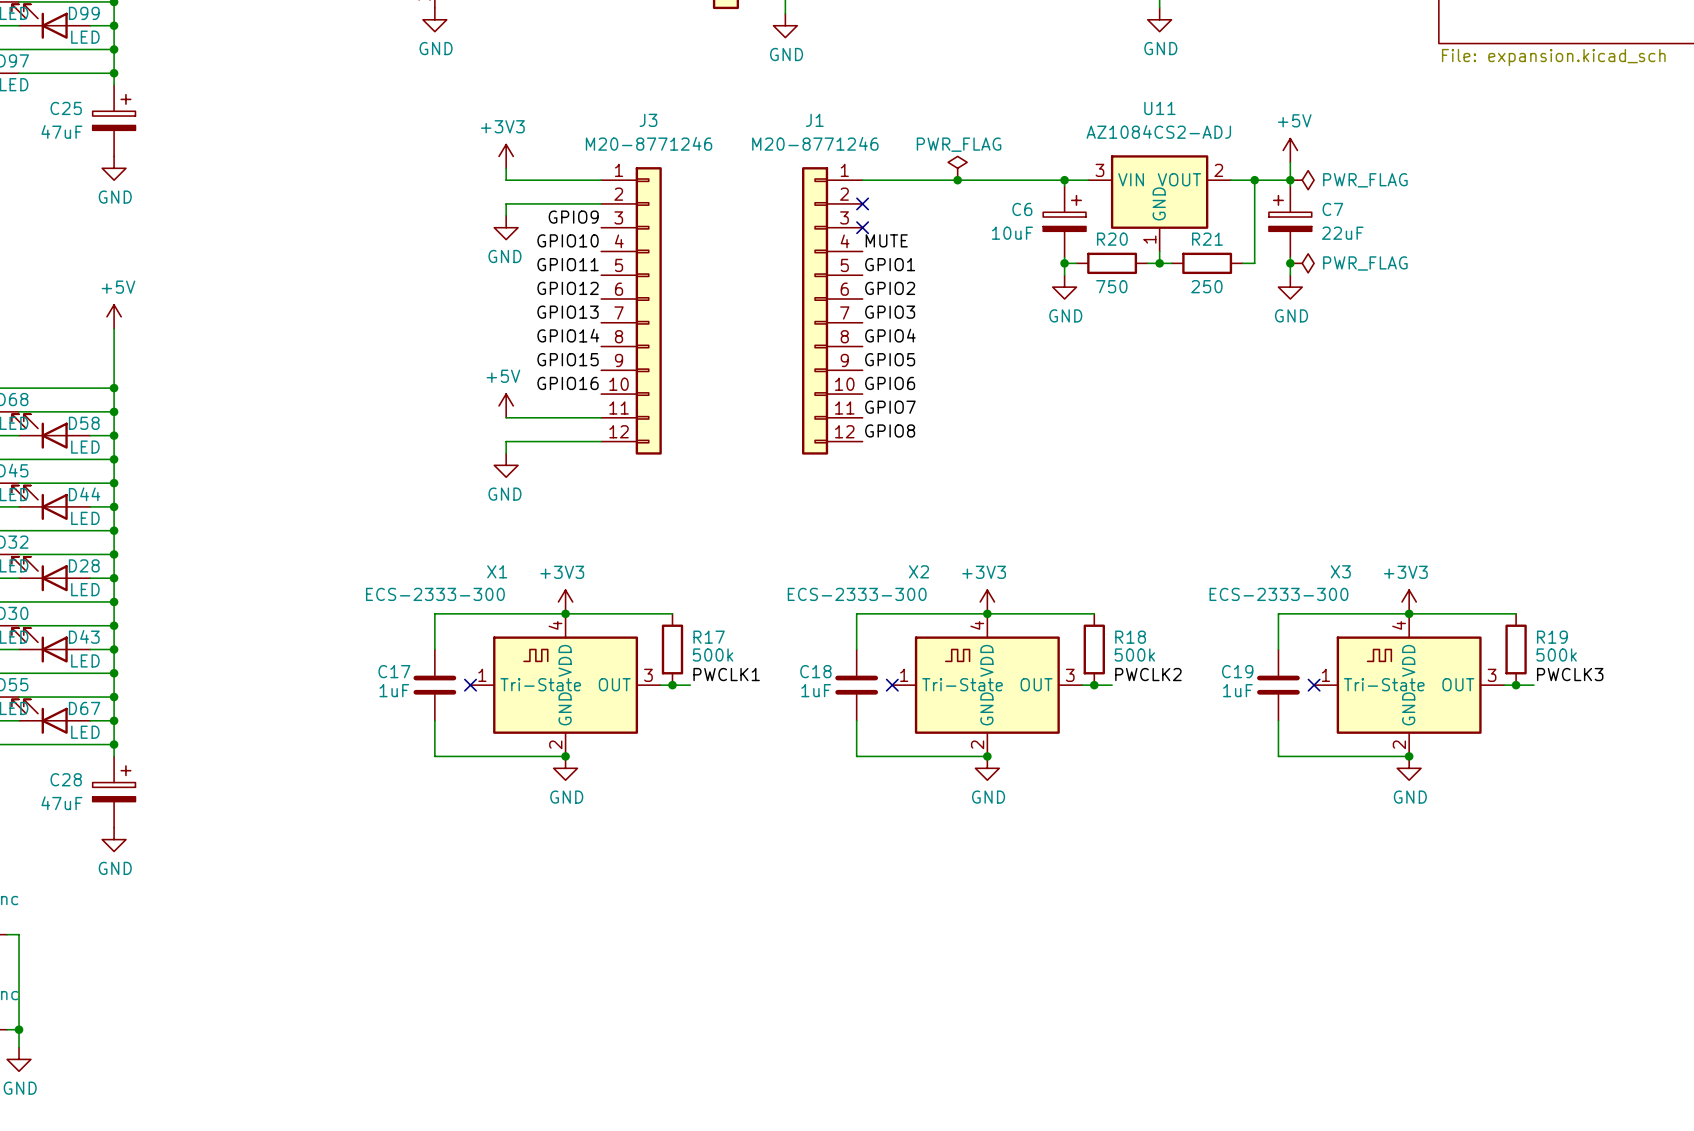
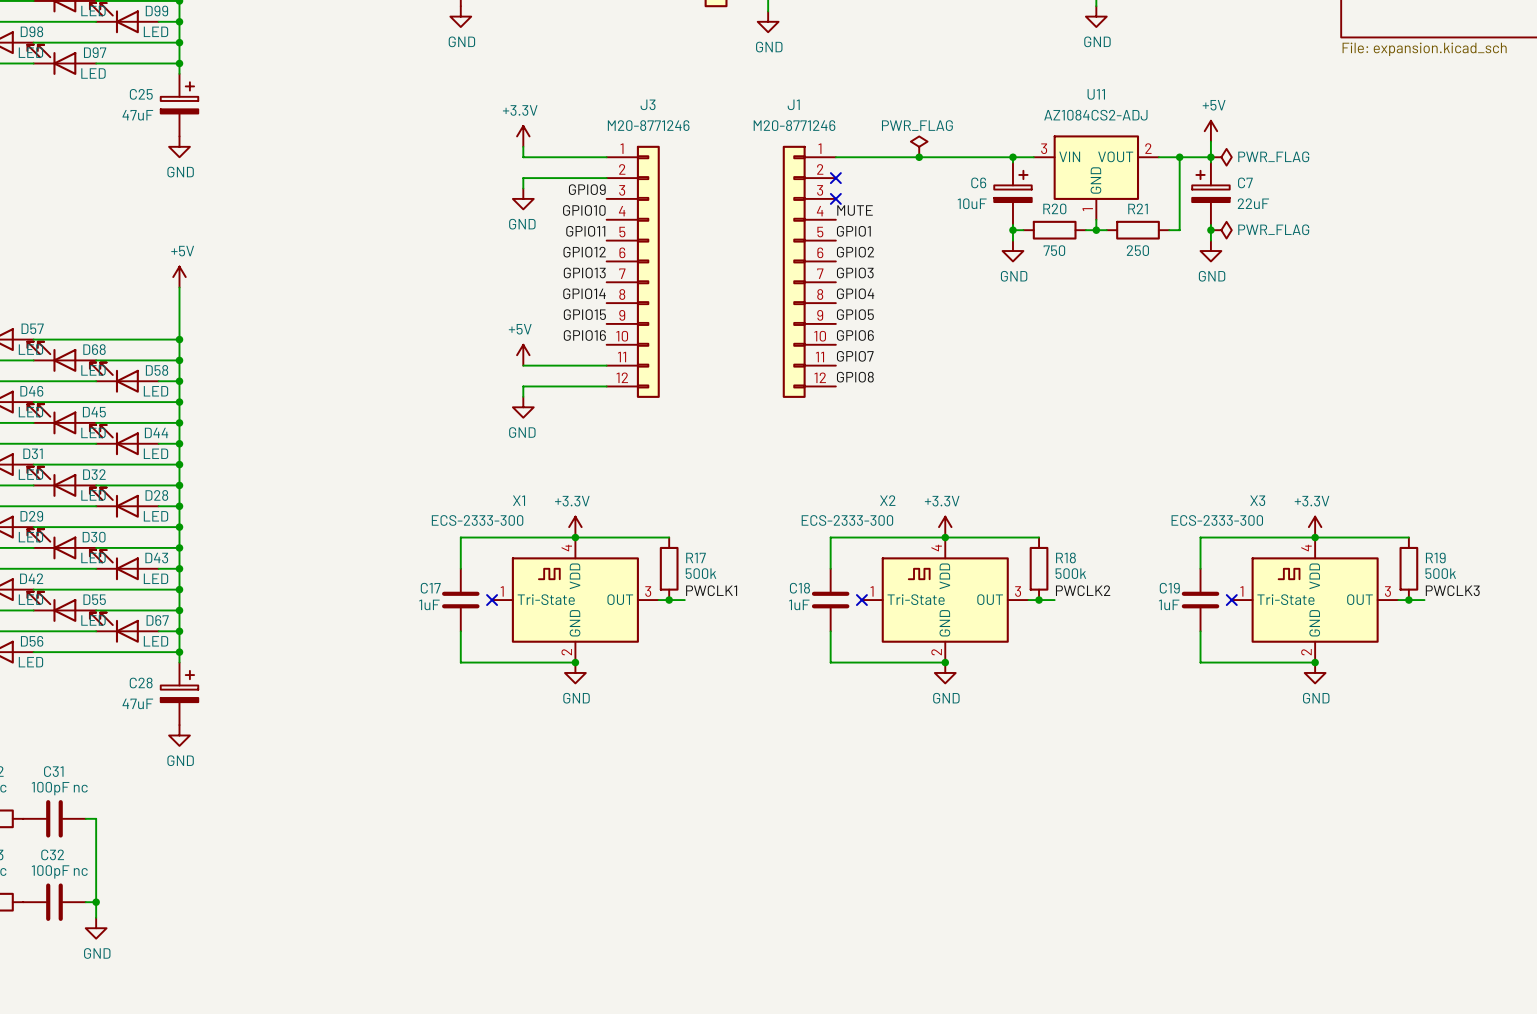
power symbol: +3V3 (506, 156) -> +3.3V (523, 136)
power symbol: +3V3 (565, 601) -> +3.3V (575, 527)
power symbol: +3V3 (987, 601) -> +3.3V (945, 527)
power symbol: +3V3 (1409, 601) -> +3.3V (1315, 527)

